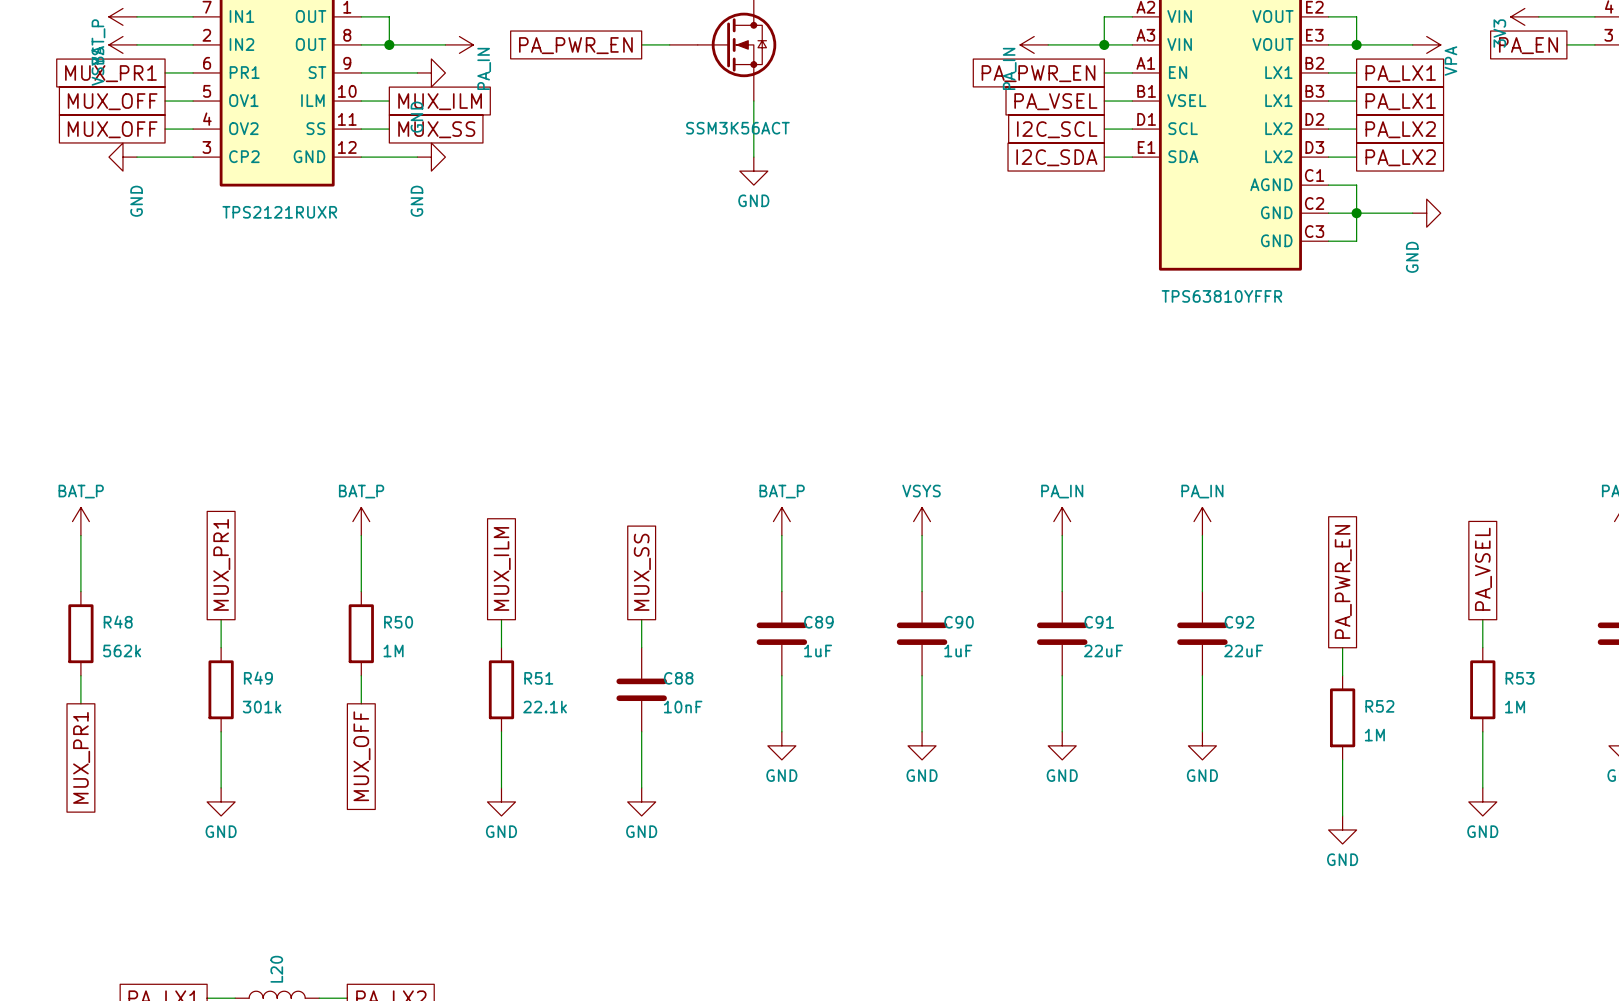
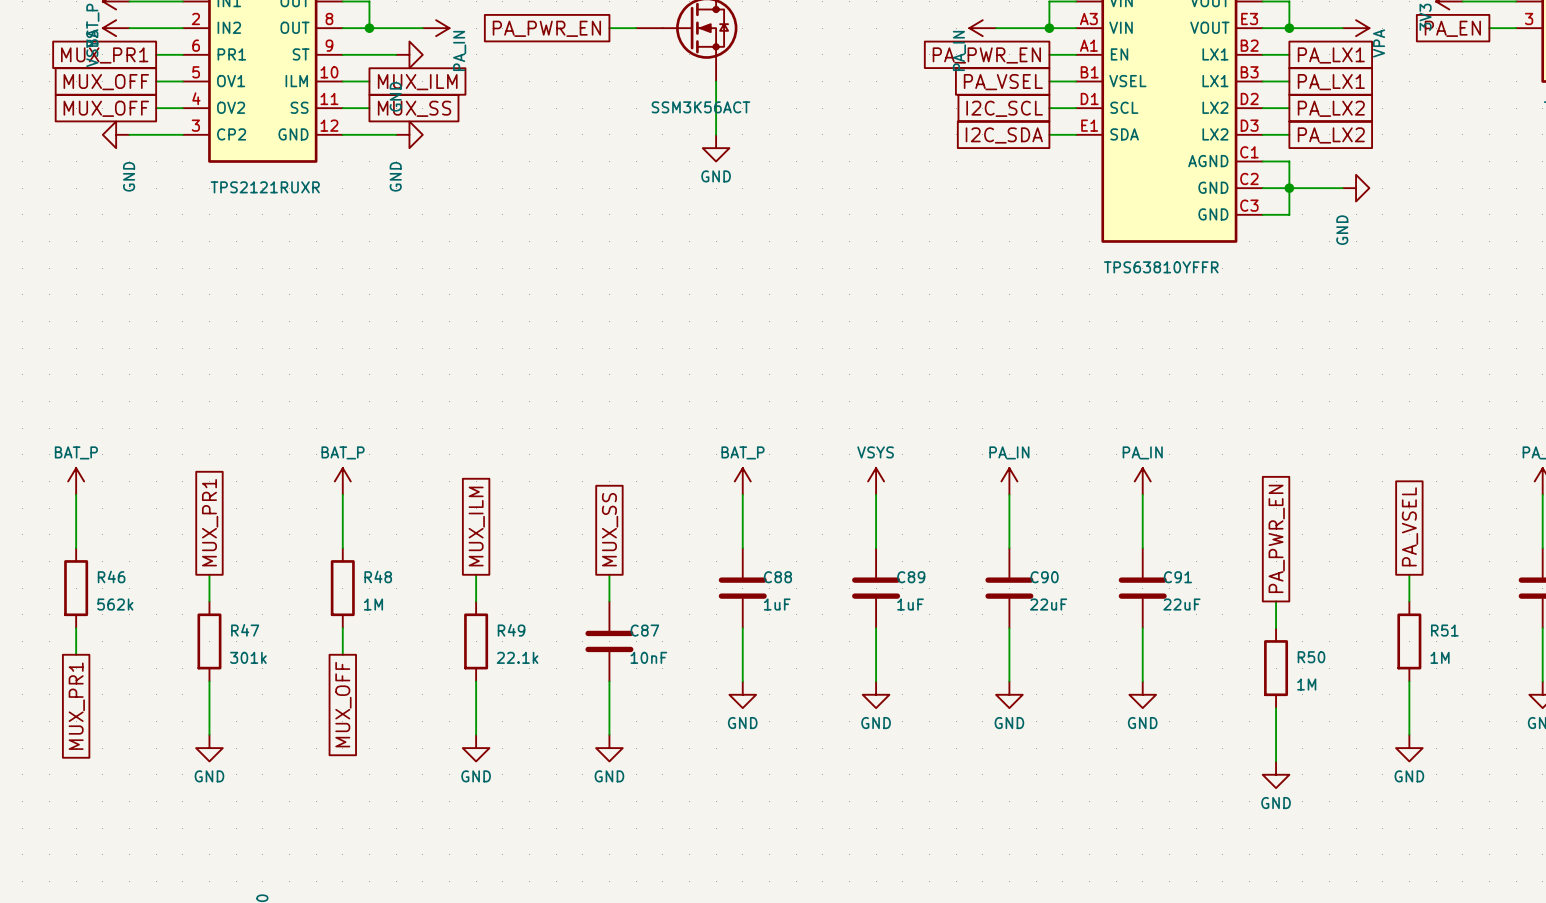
R48 name: R48 (118, 622) -> R46 (111, 576)
R50 name: R50 (398, 622) -> R48 (378, 576)
C89 name: C89 (818, 622) -> C88 (777, 577)
C90 name: C90 (959, 622) -> C89 (911, 577)
C91 name: C91 (1099, 622) -> C90 (1044, 577)
C92 name: C92 (1239, 622) -> C91 (1177, 577)
R49 name: R49 (258, 678) -> R47 (245, 630)
R51 name: R51 (538, 678) -> R49 (511, 630)
C88 name: C88 (678, 678) -> C87 (644, 630)
R53 name: R53 (1520, 678) -> R51 (1444, 630)
R52 name: R52 (1379, 706) -> R50 (1311, 657)

